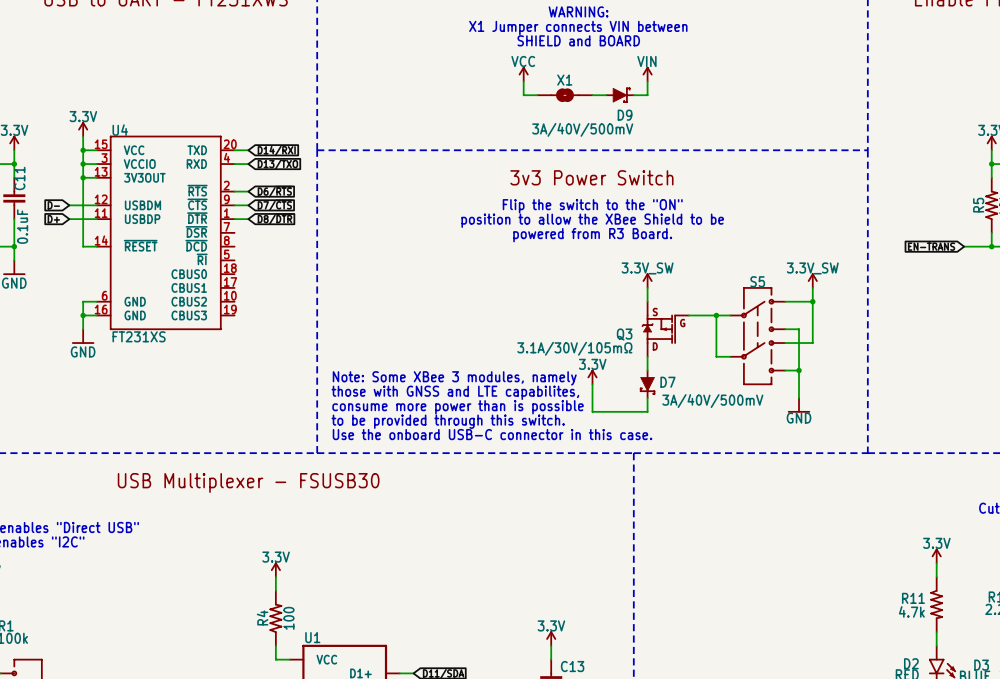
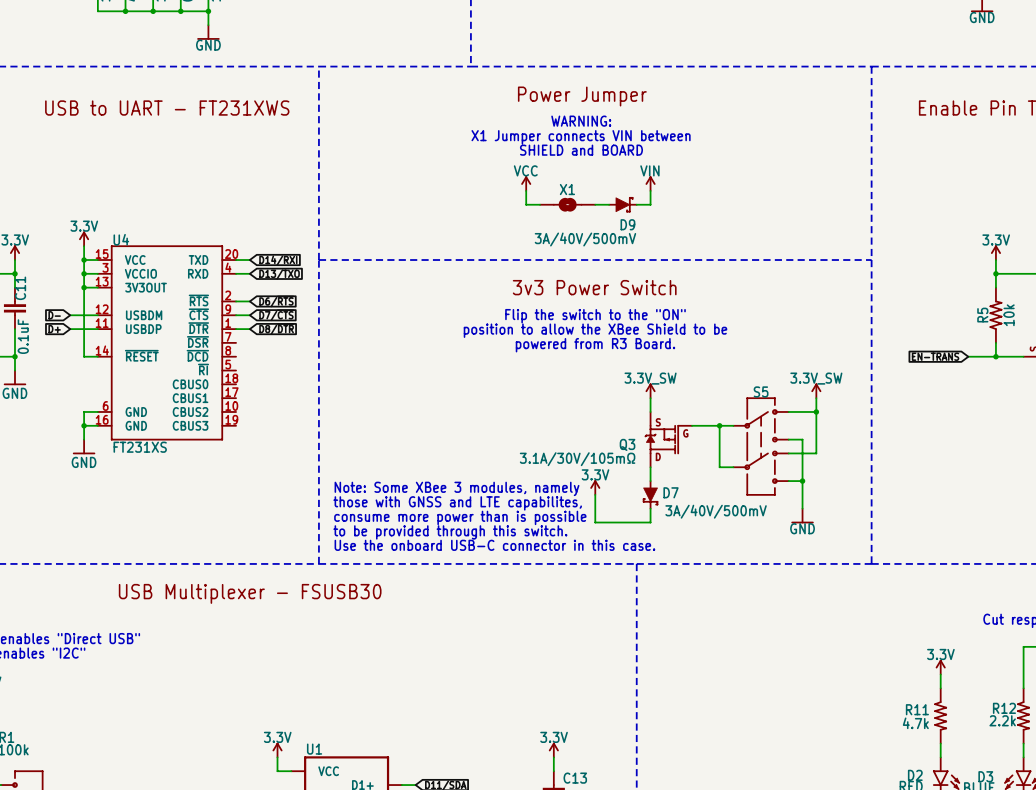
power symbol position: 3.3V (275, 569) -> 3.3V (277, 750)
wire: (275, 577) (275, 590) -> none
R4: 100 (275, 618) -> none

